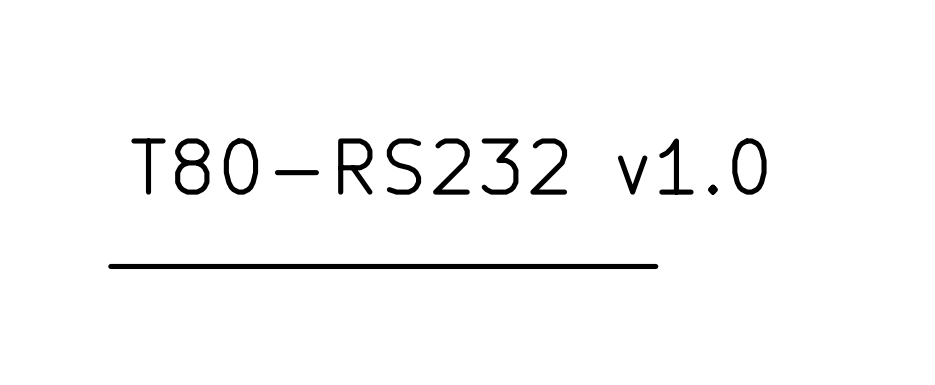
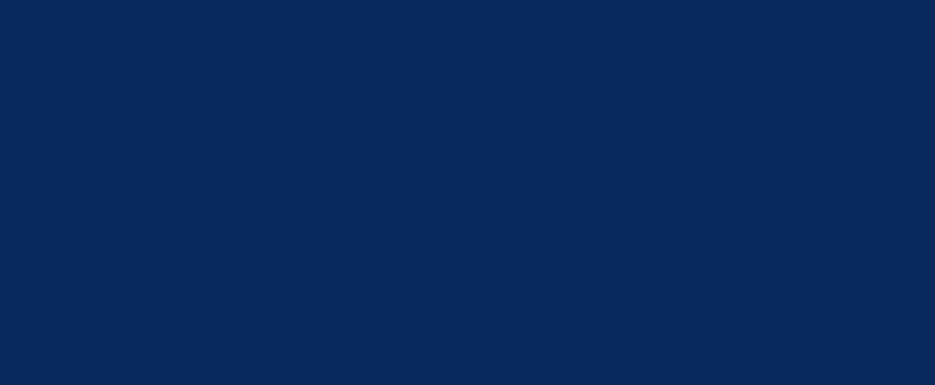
text: T80-RS232 v1.0 (448, 166) -> none
line: (110, 266) (655, 266) -> none

